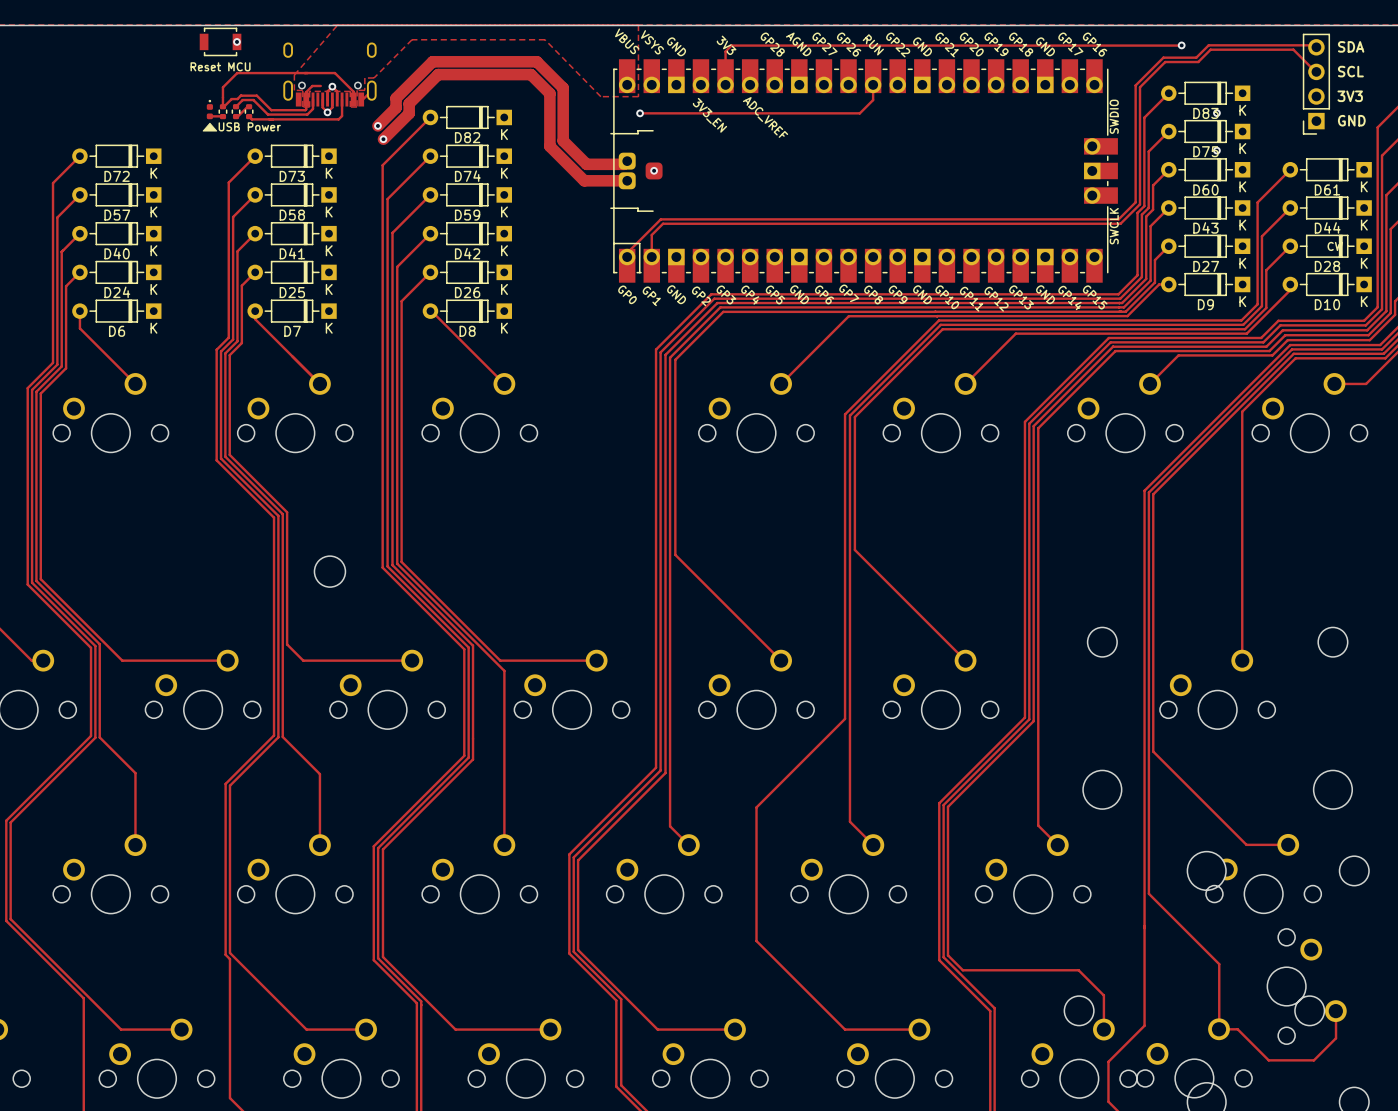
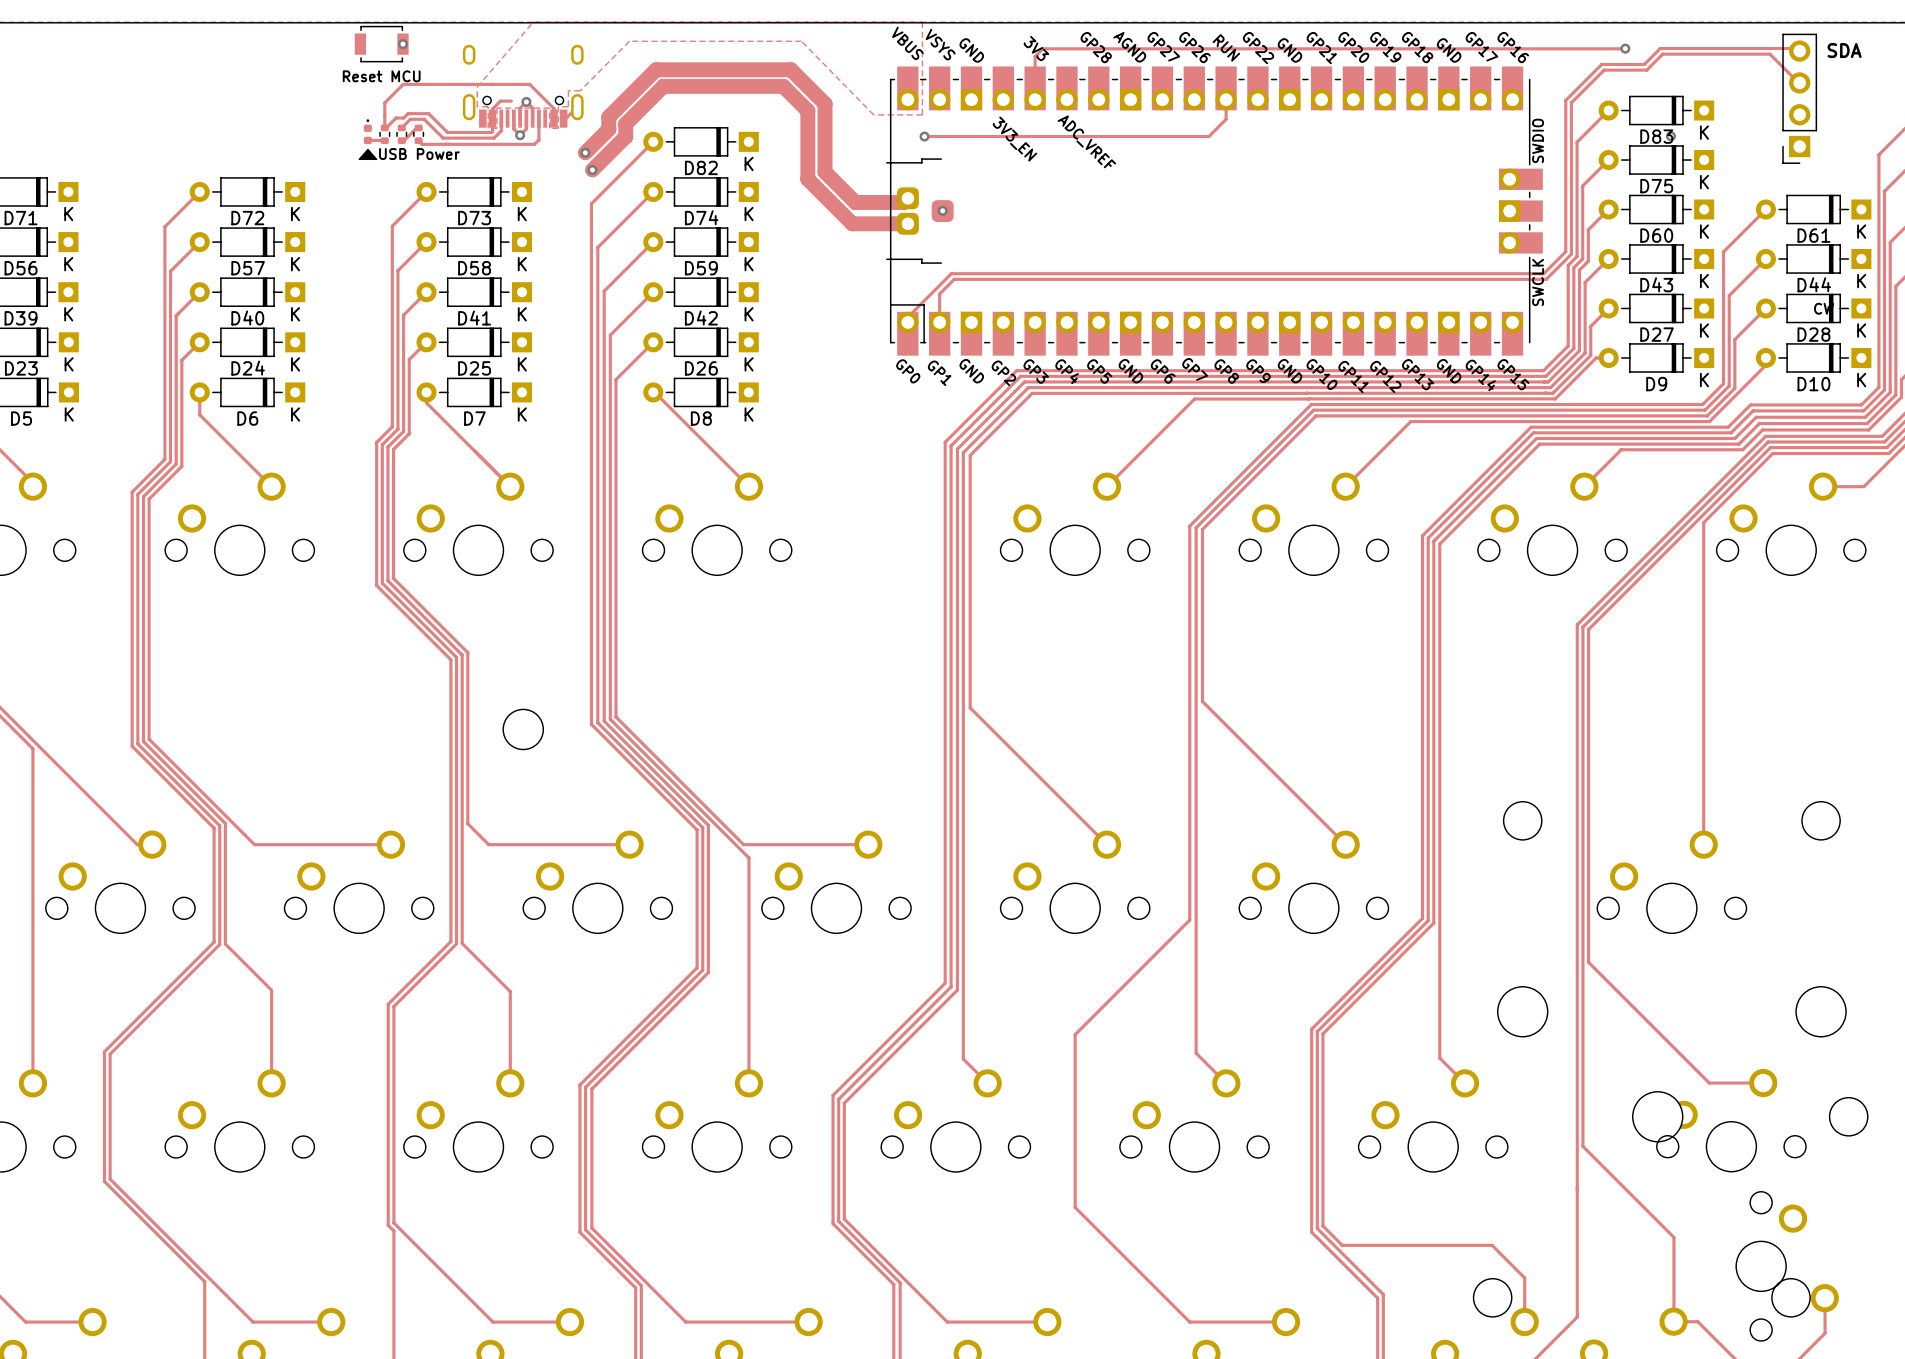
text: SCL (1350, 71) -> none
text: 3V3 (1350, 96) -> none
text: GND (1351, 120) -> none
via: (1216, 150) -> none

